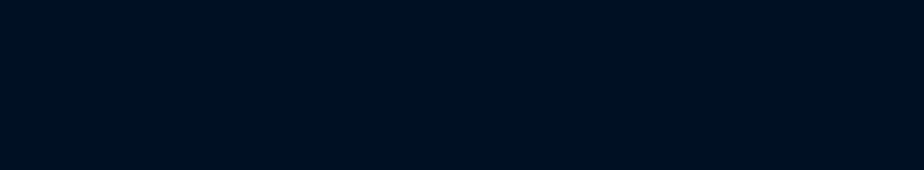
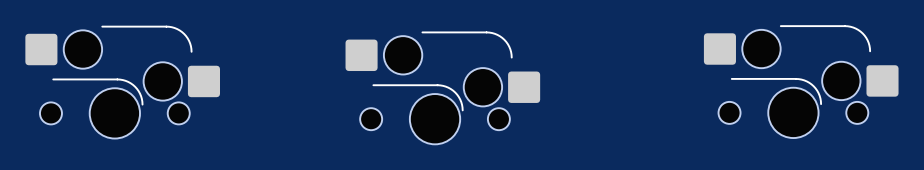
part: none -> (801, 81)
part: none -> (122, 82)
part: none -> (442, 87)

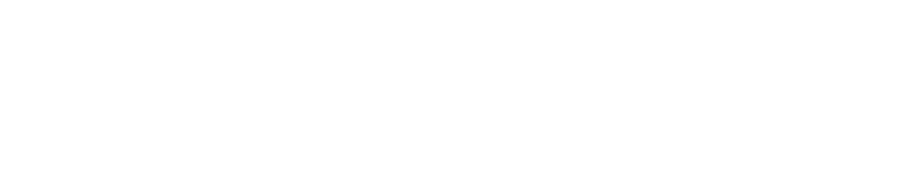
part: (801, 81) -> none
part: (122, 82) -> none
part: (442, 87) -> none

